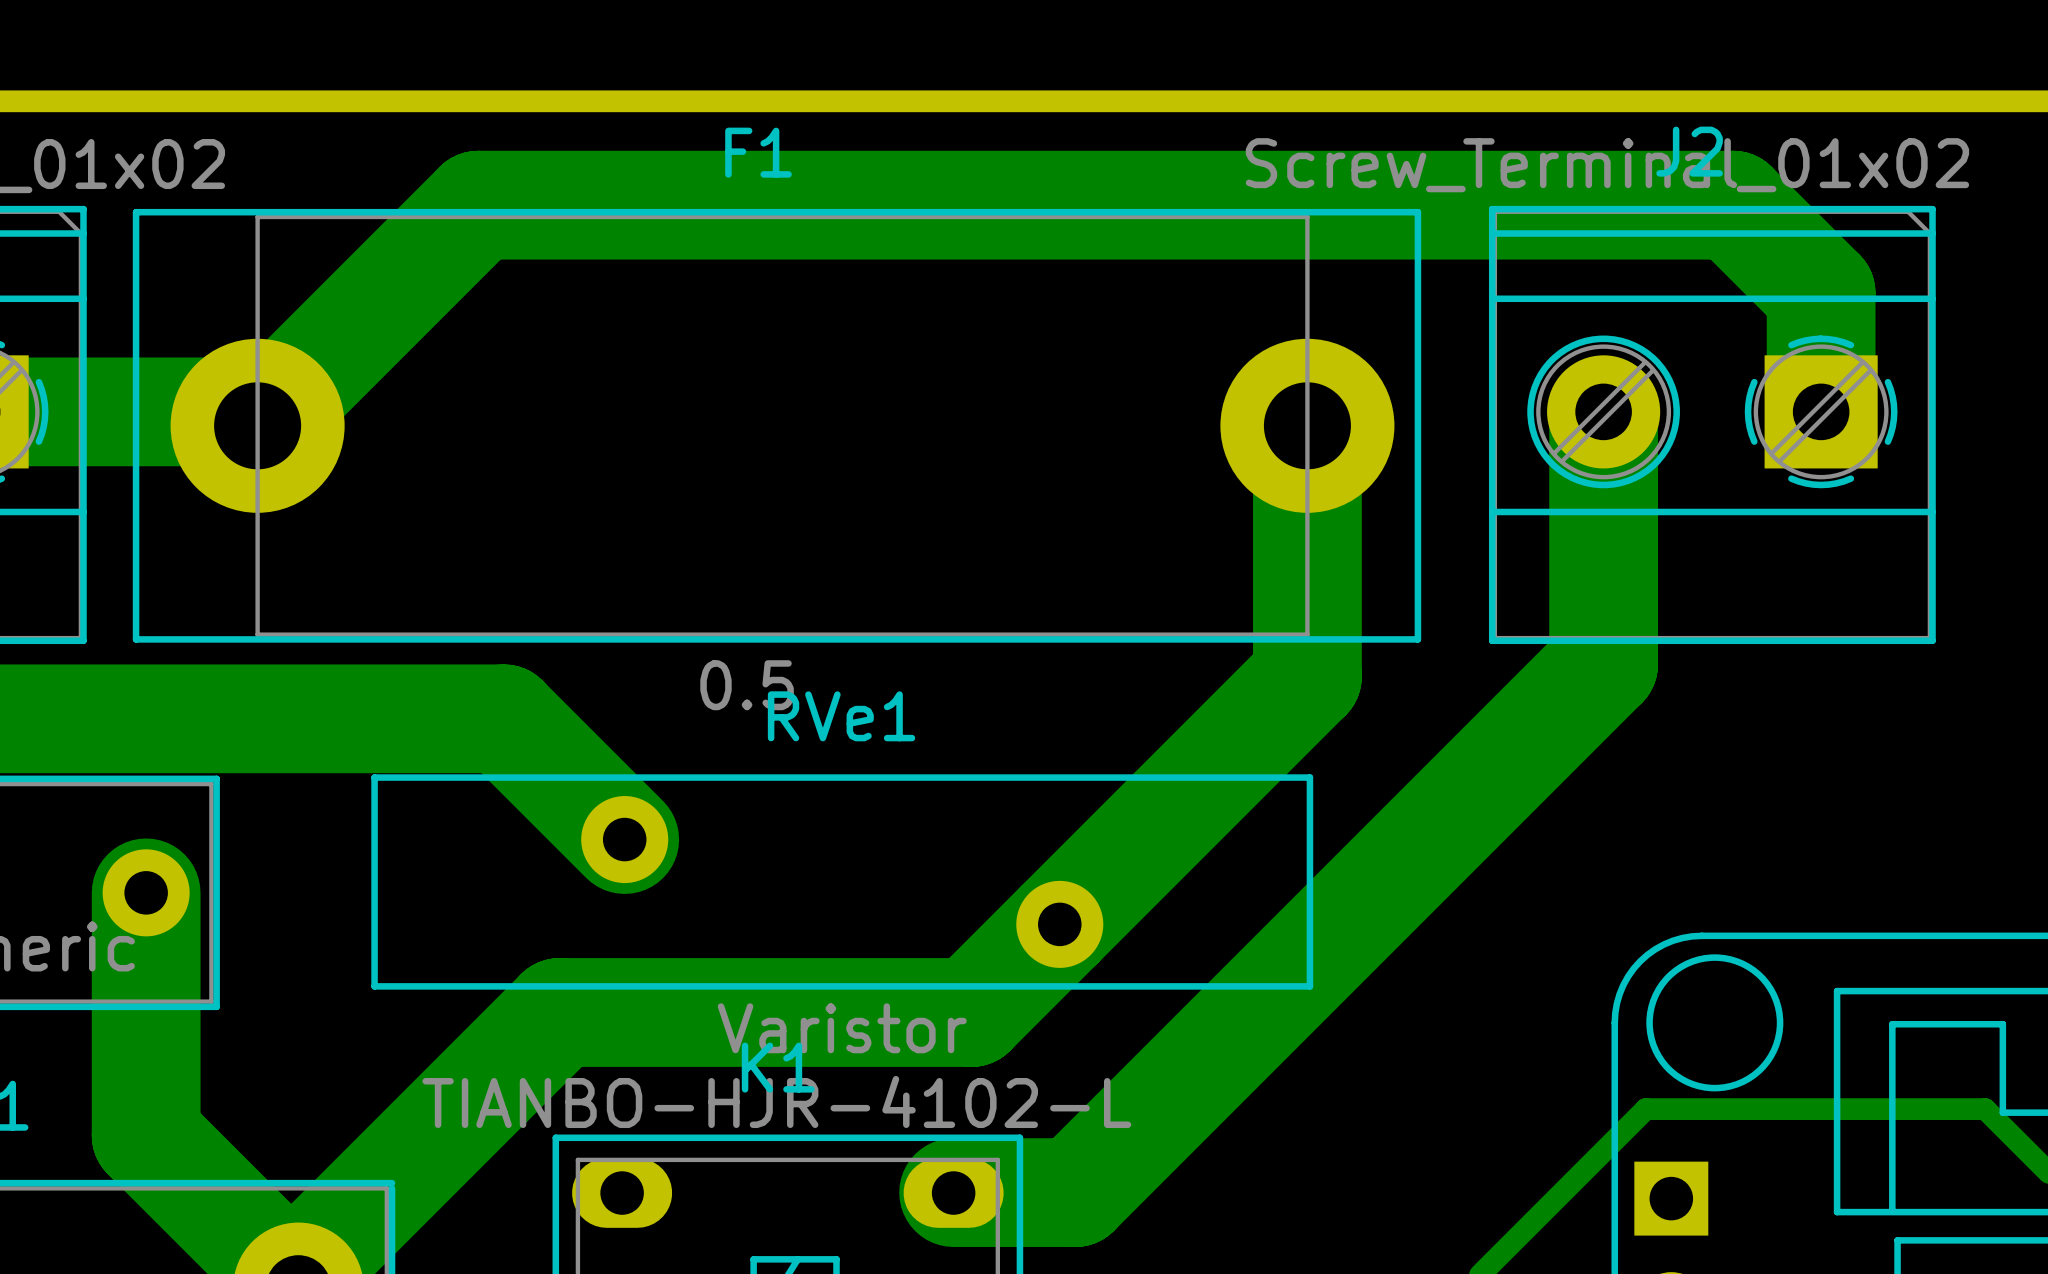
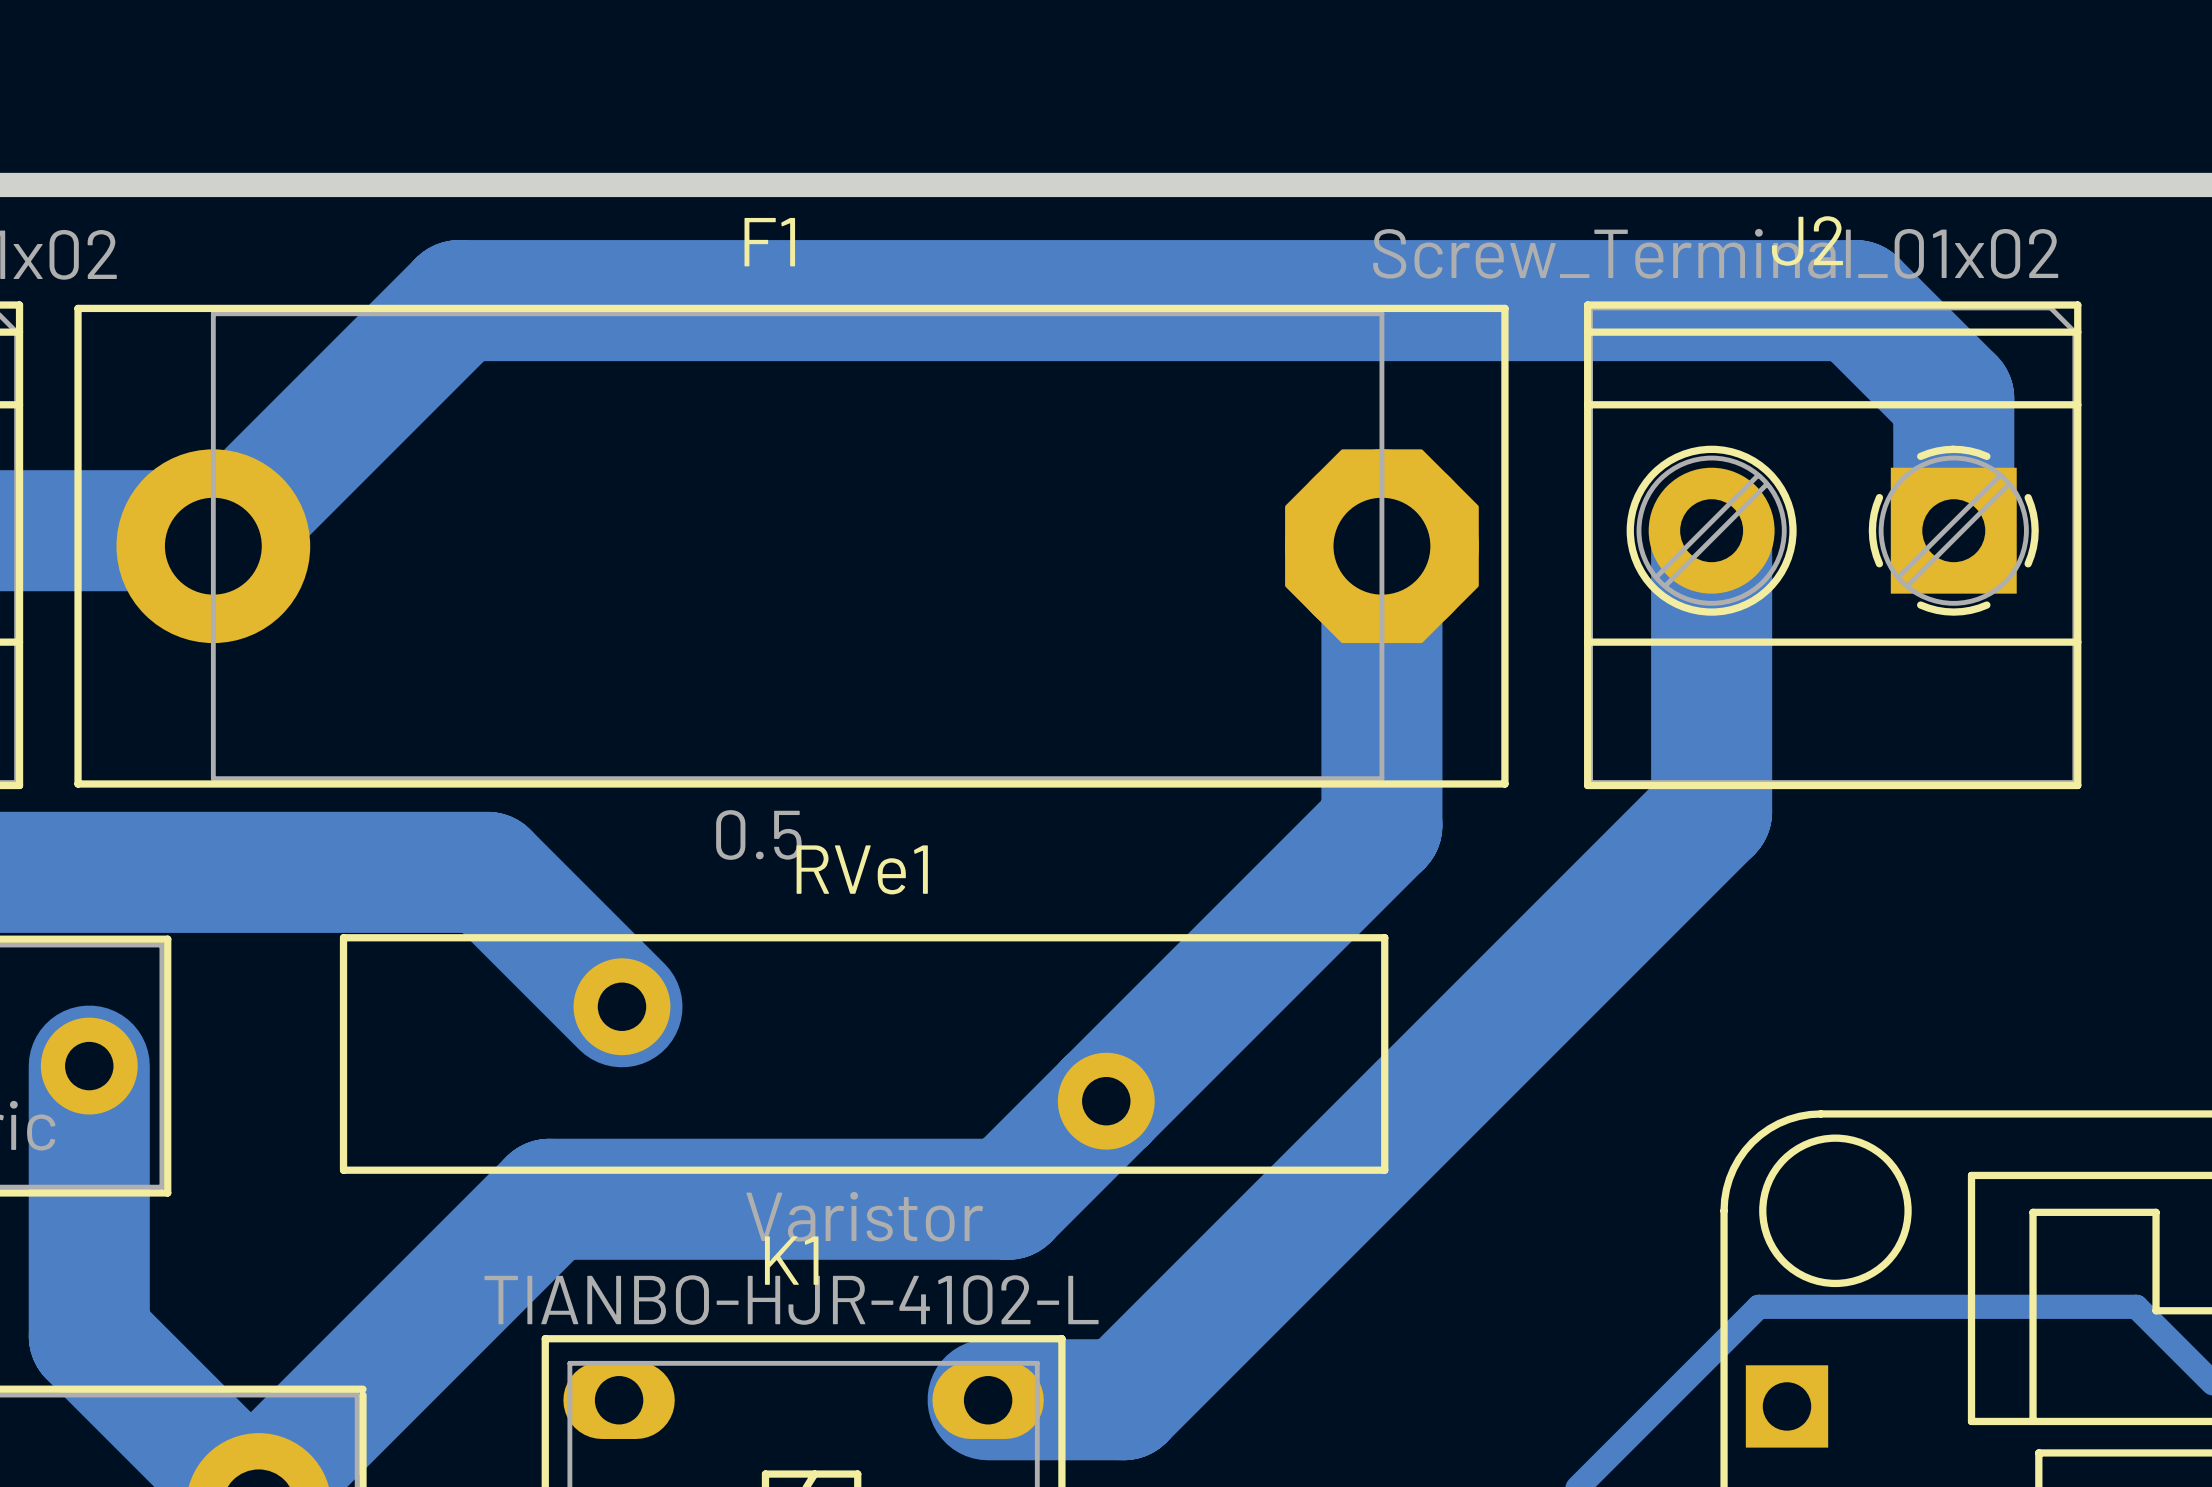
F1 footprint: [132, 208, 1422, 643] -> [74, 304, 1509, 788]

